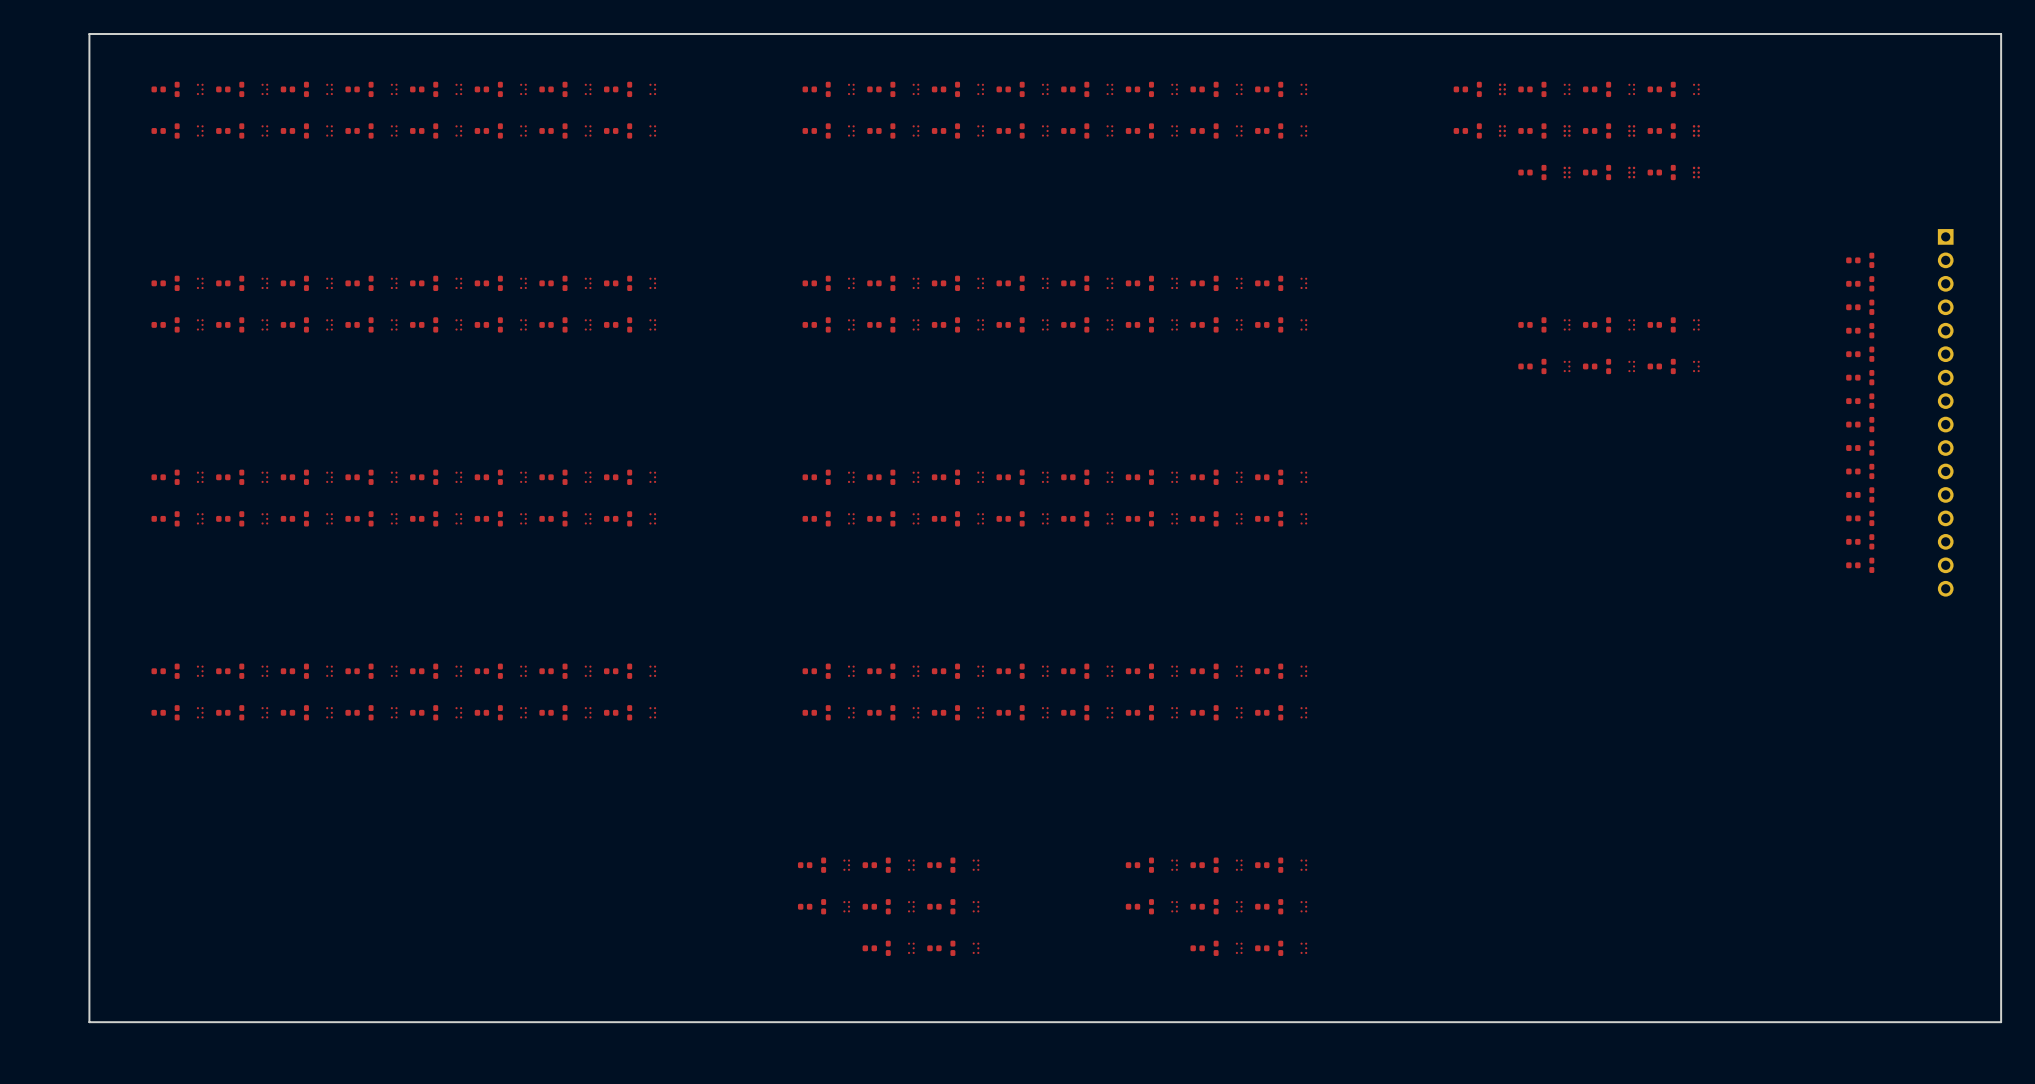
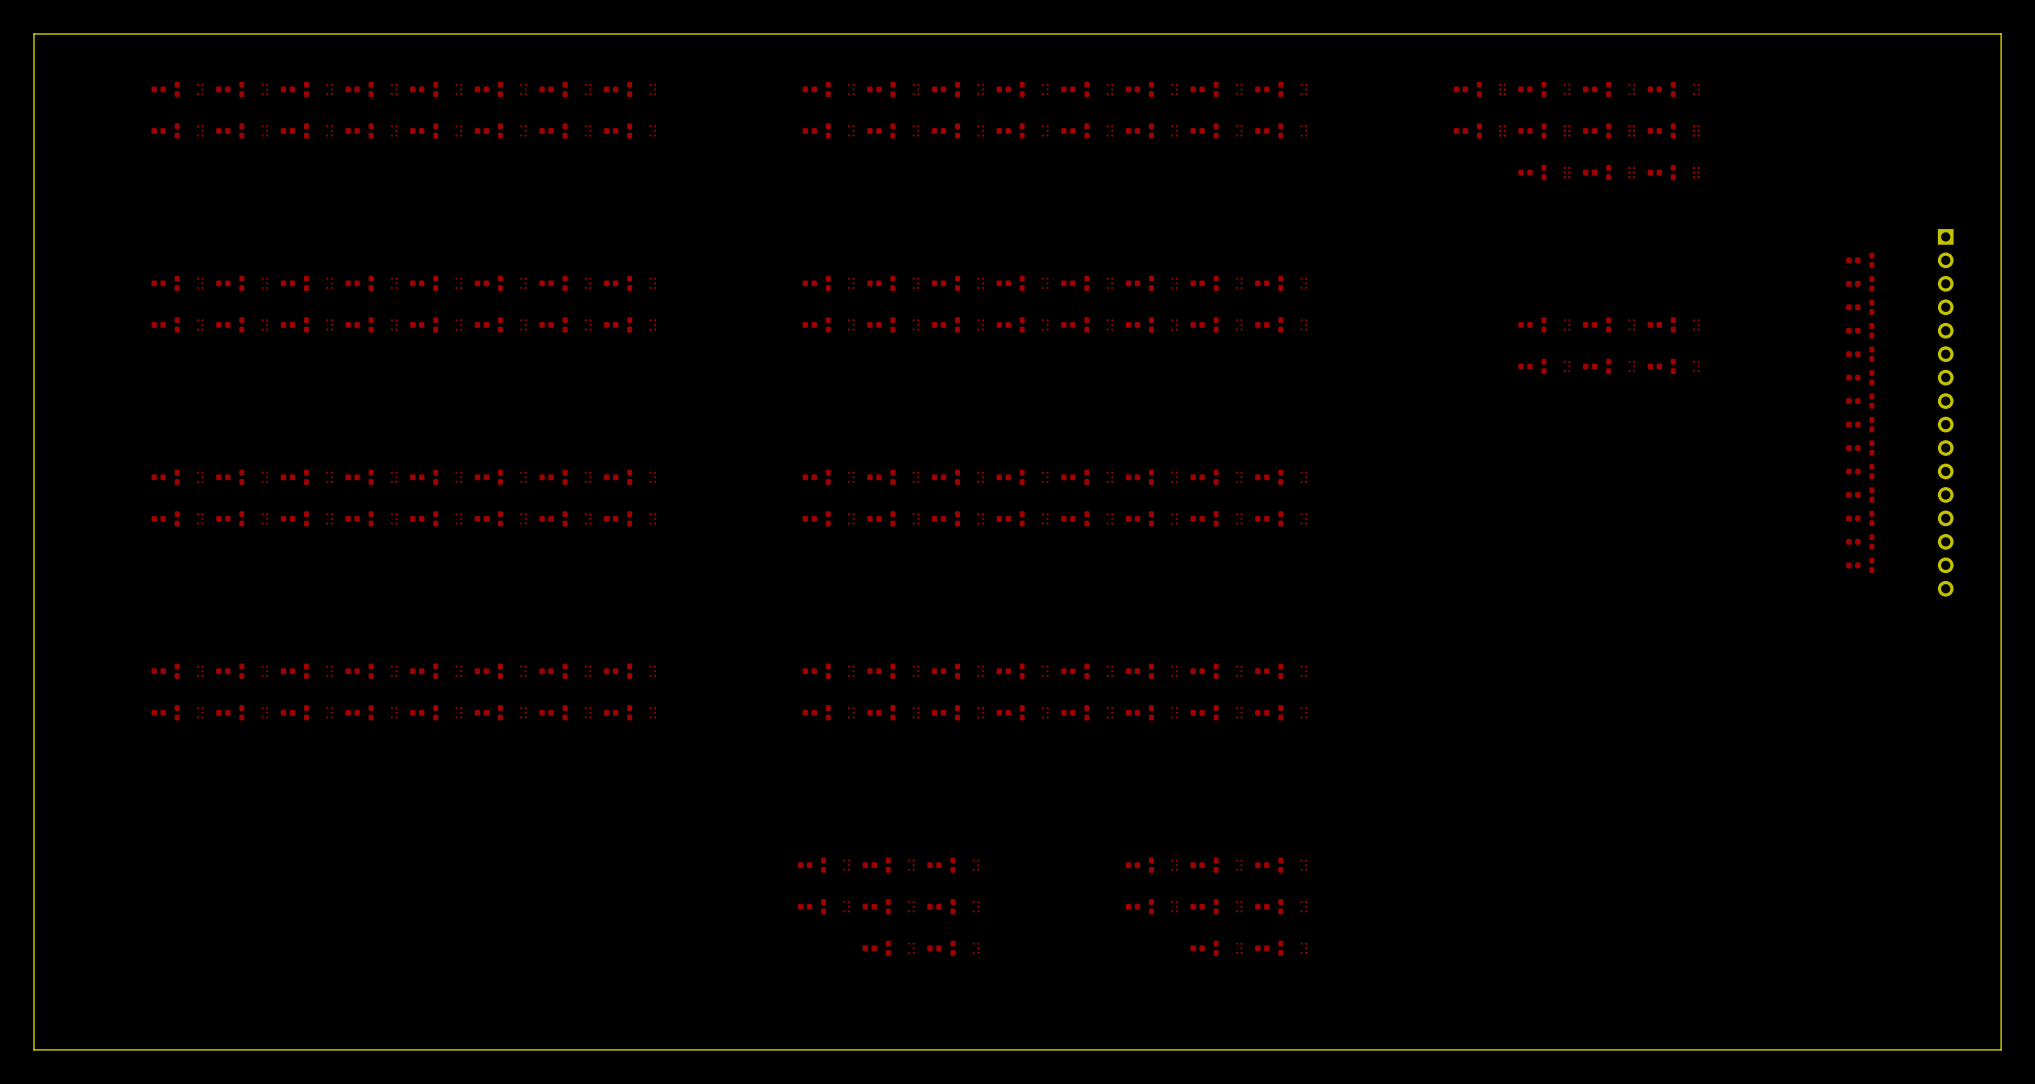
board edge: (89, 34) (89, 1022) (2001, 1022) -> (89, 34) (34, 34) (34, 1049) (2001, 1049) (2001, 1022)

